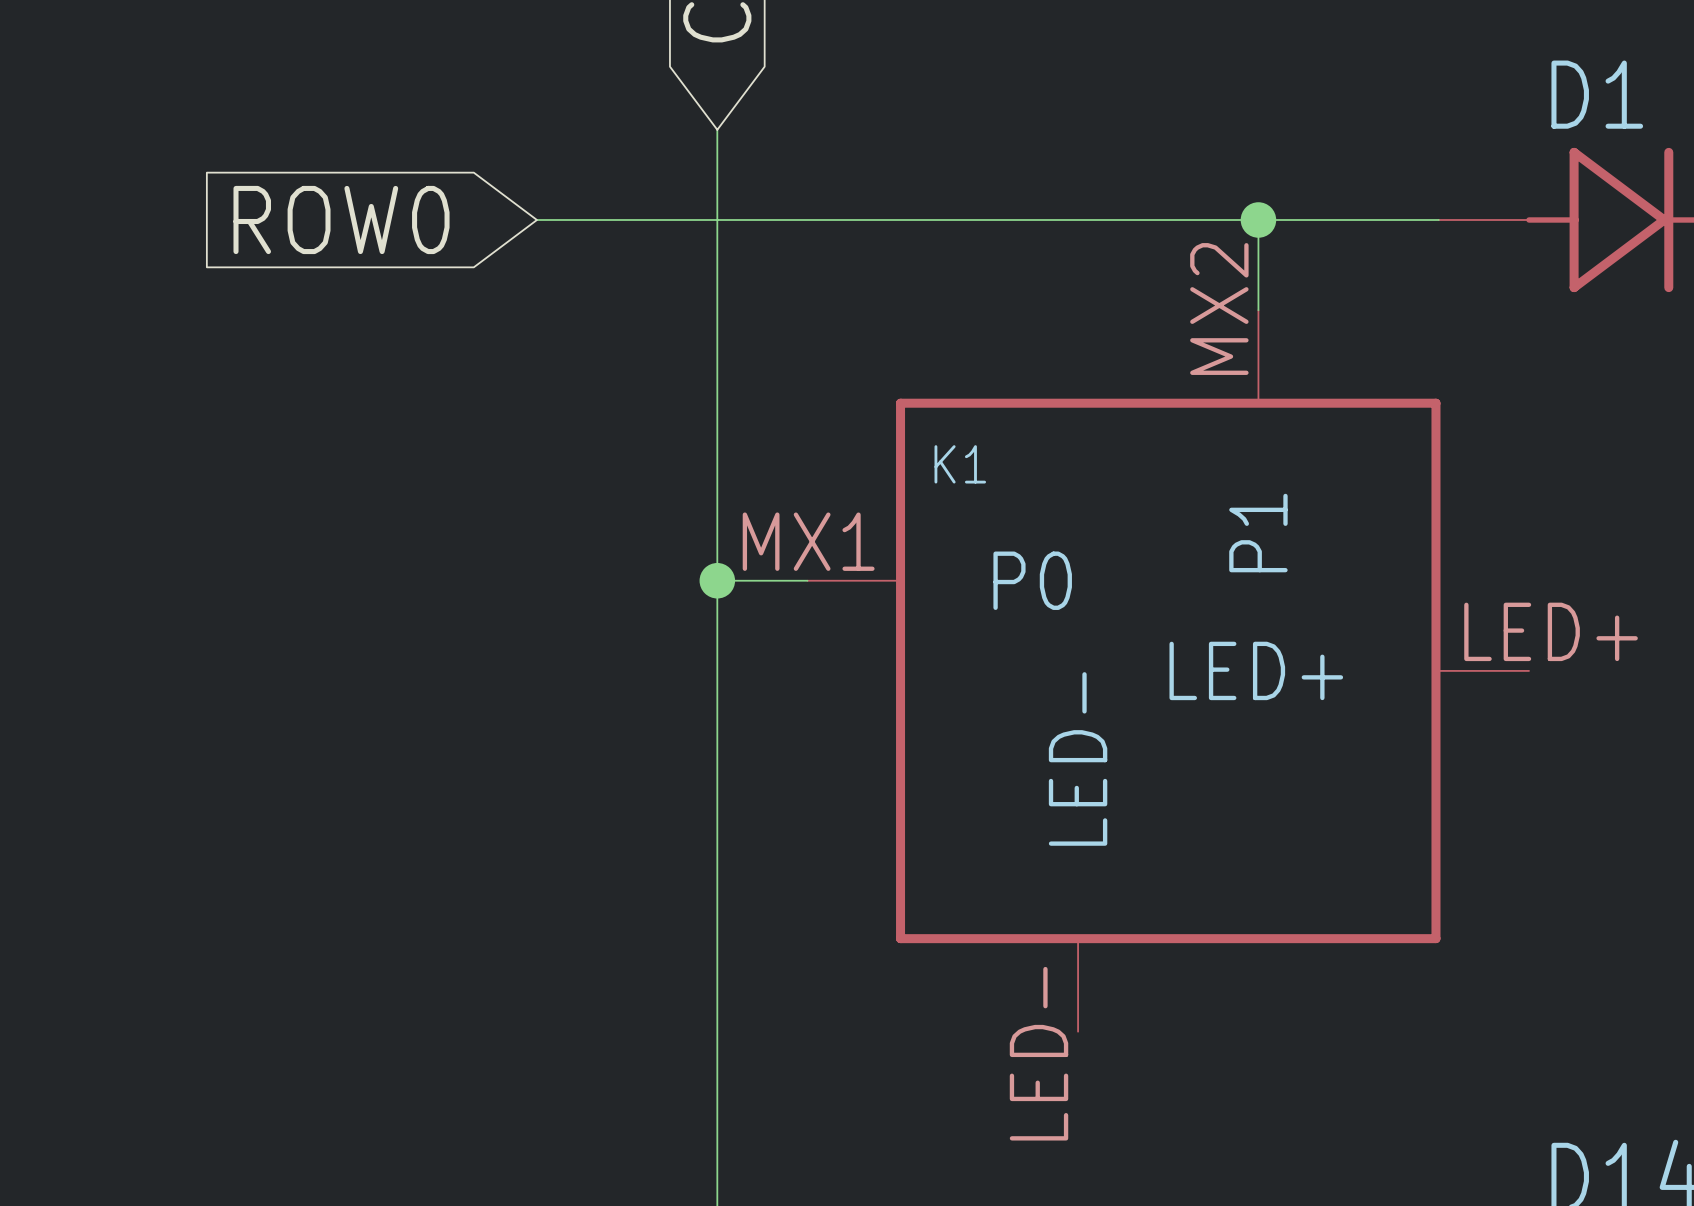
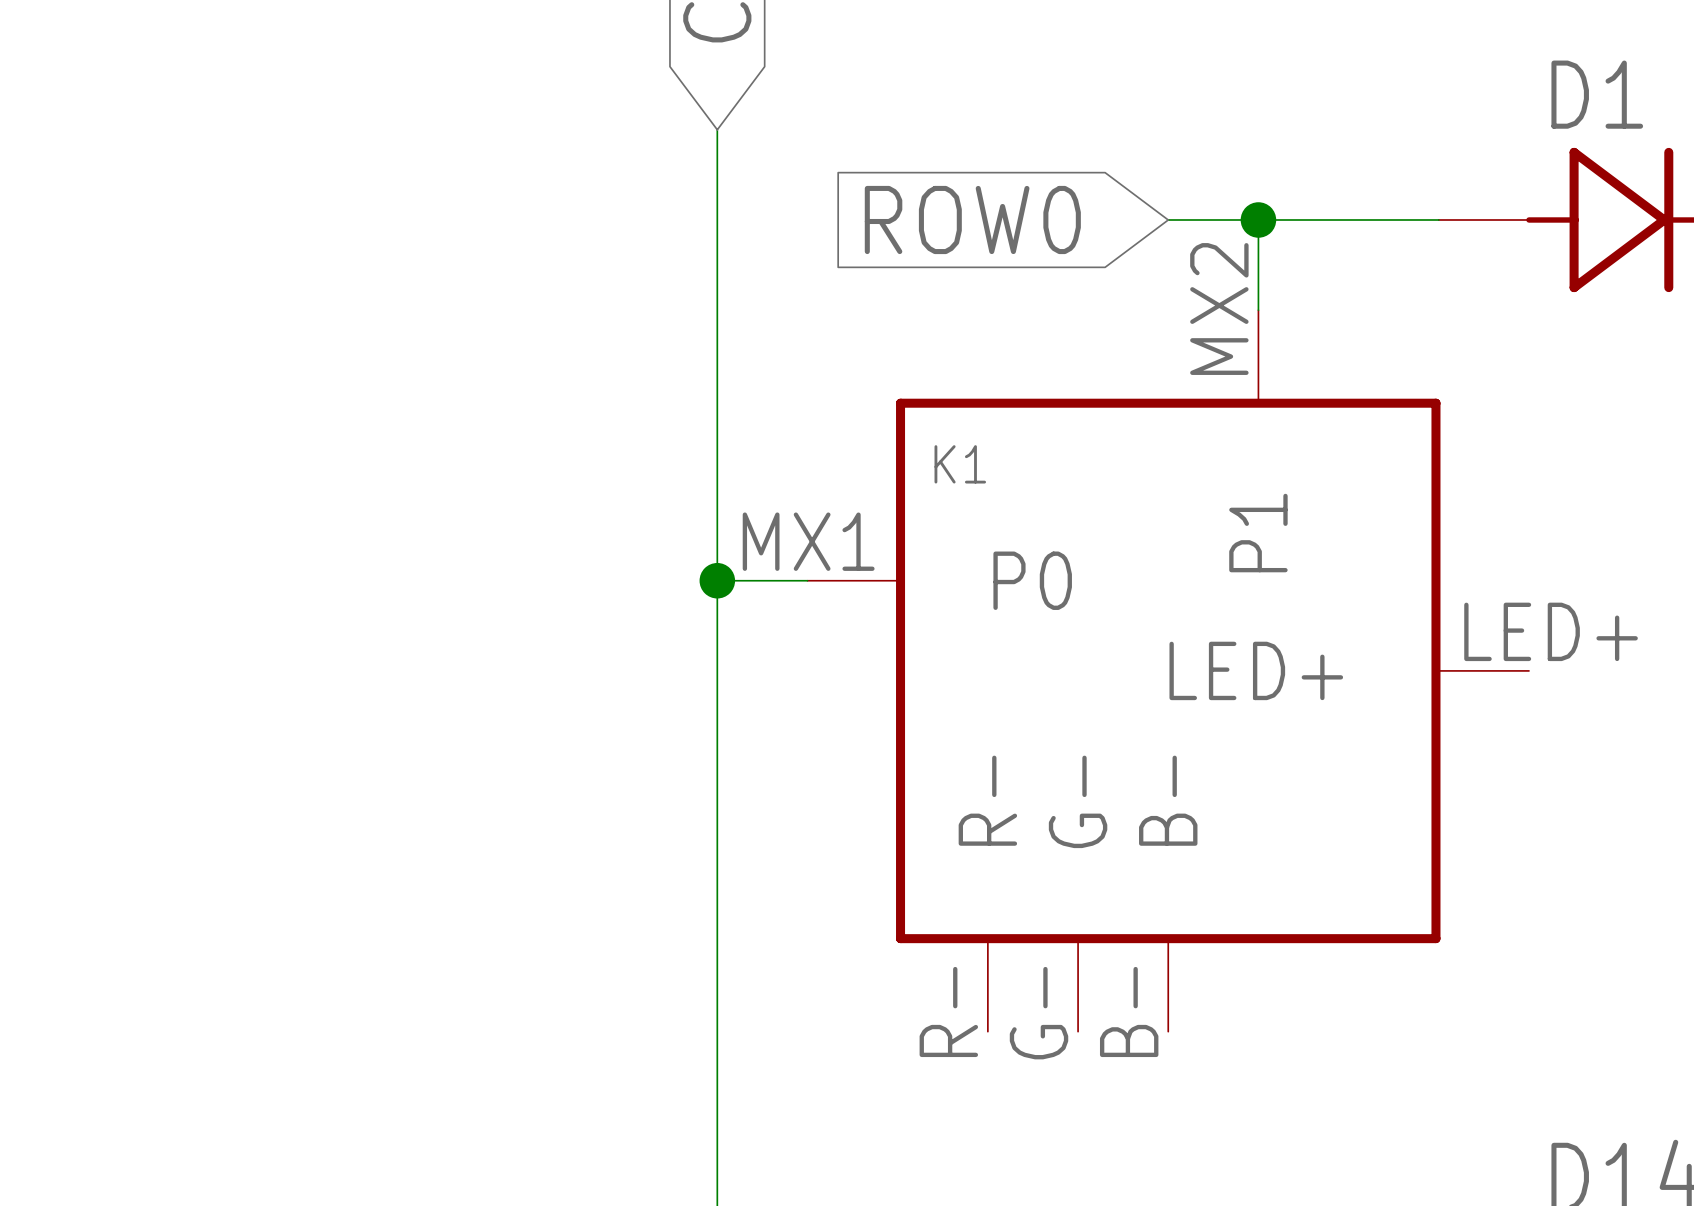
global label position: ROW0 (341, 219) -> ROW0 (972, 219)
wire: (536, 219) (1168, 219) -> none
K1 symbol: [807, 310, 1530, 1032] -> [807, 310, 1530, 1032]

